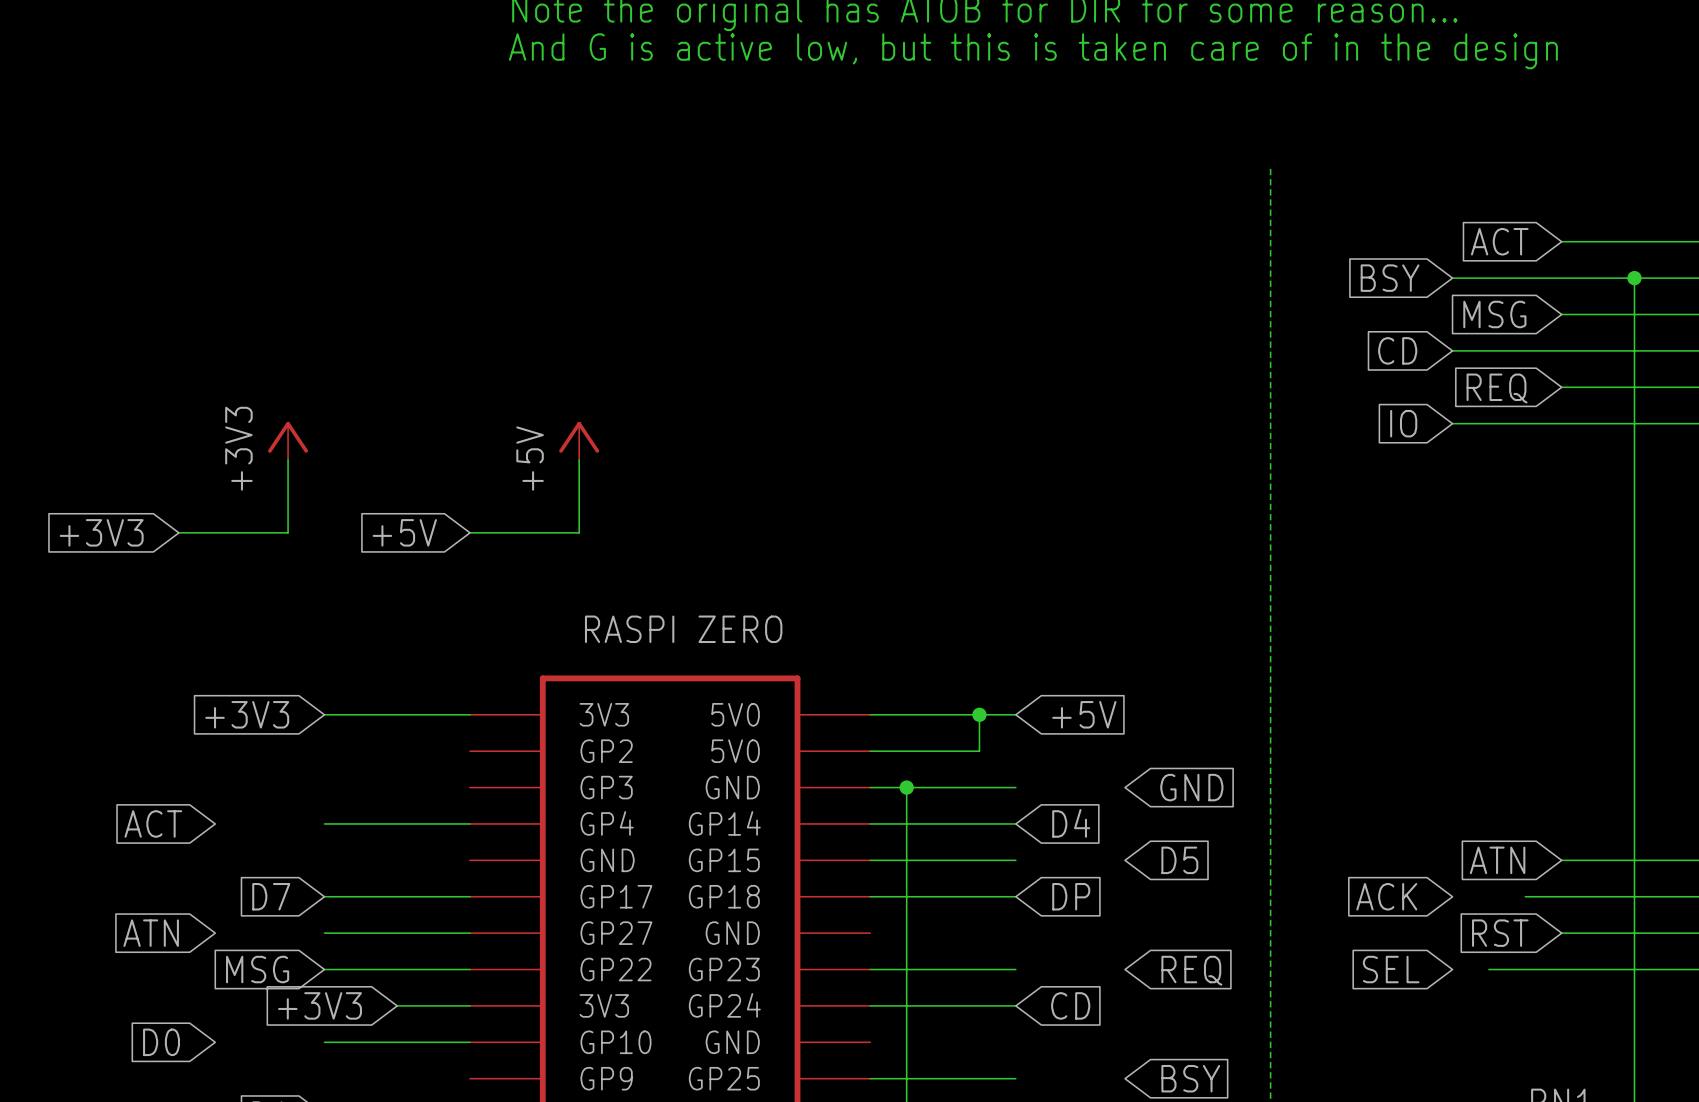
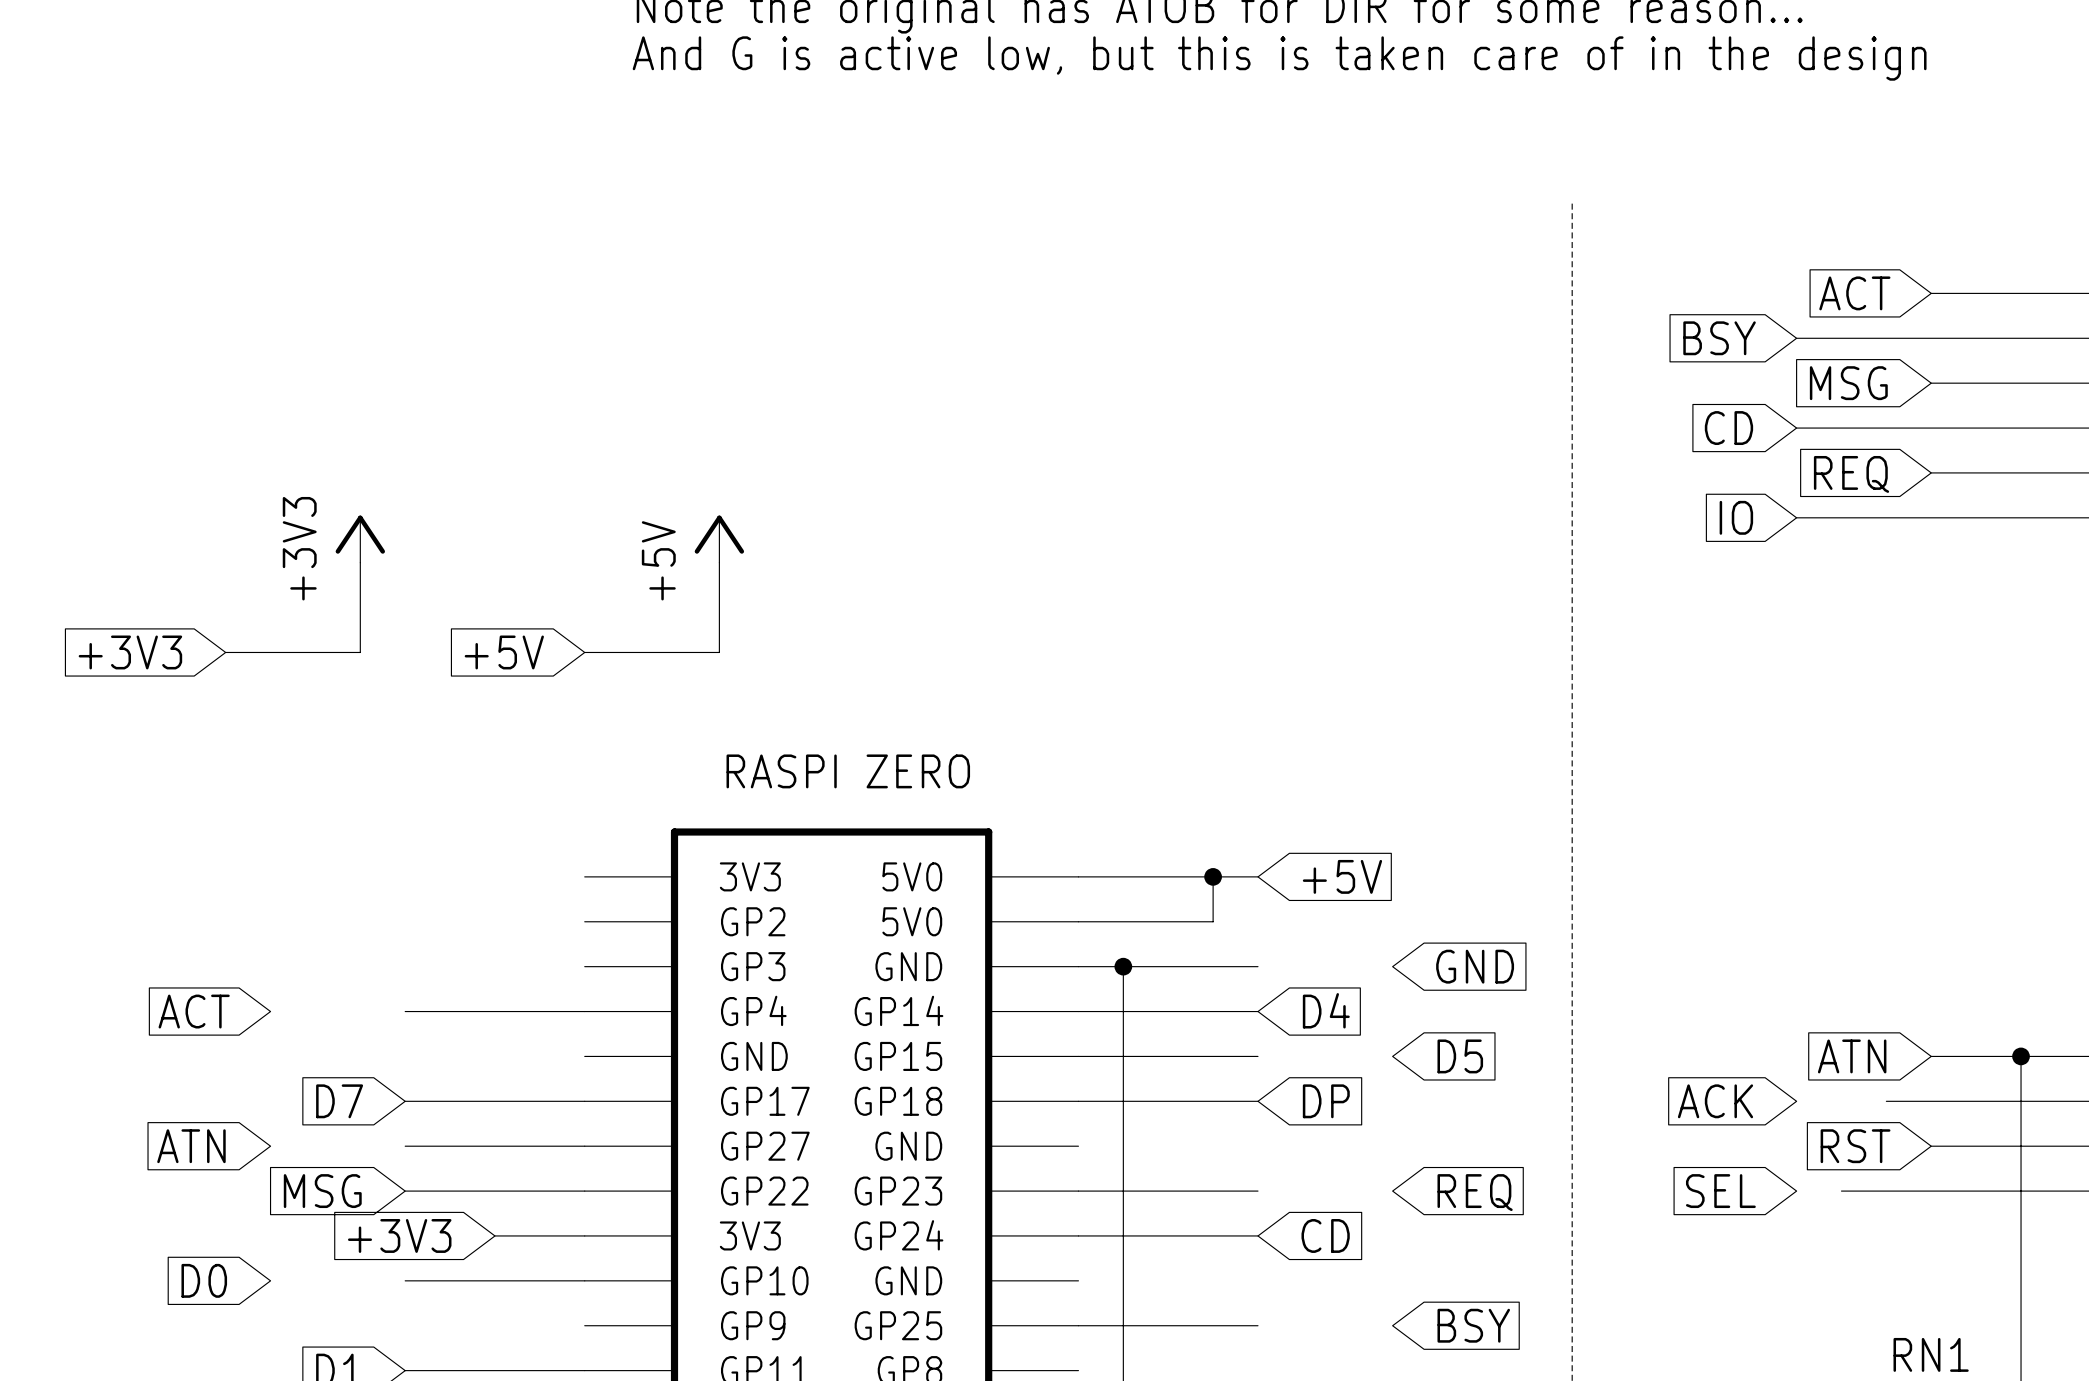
wire: (1634, 278) (1634, 860) -> none
junction: (1634, 278) -> none
global label: +3V3 (247, 714) -> none
wire: (324, 714) (470, 714) -> none
junction: none -> (2021, 1056)

